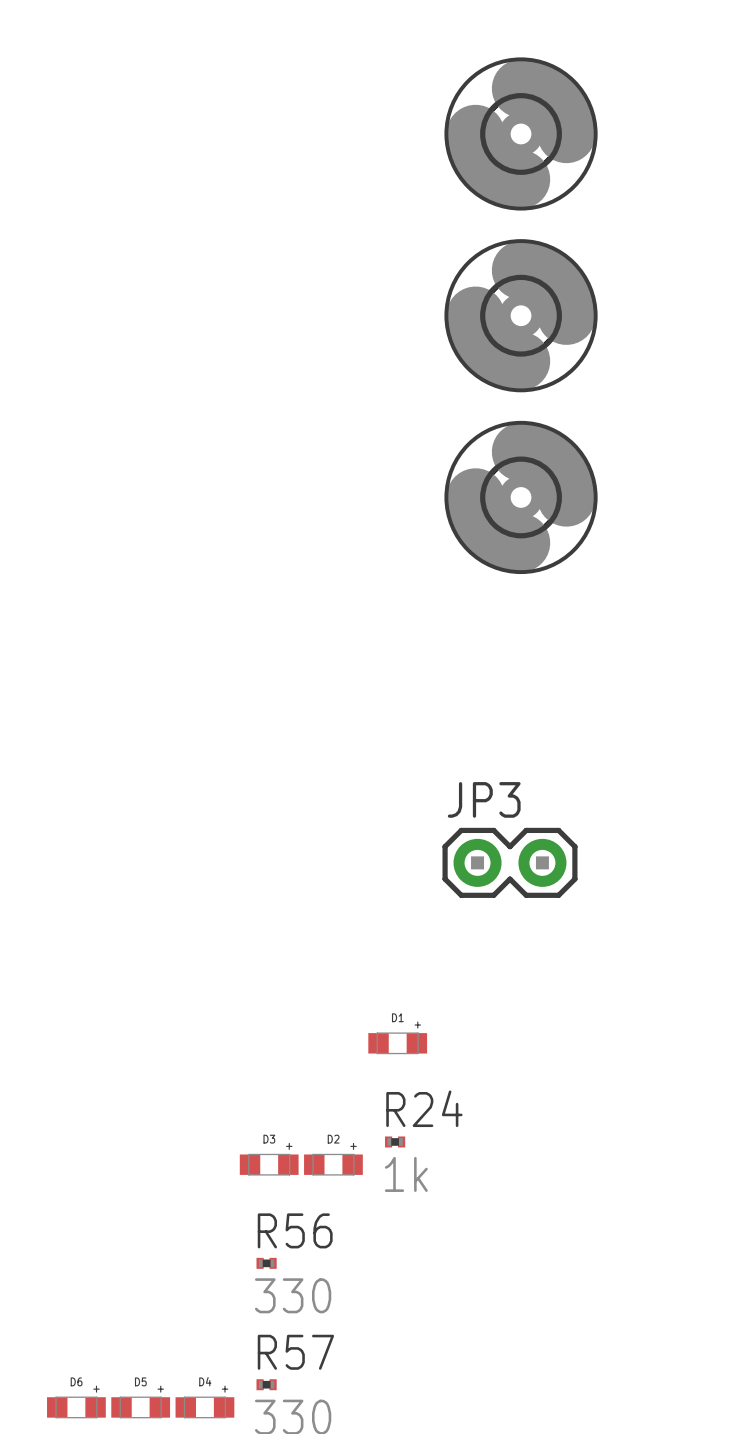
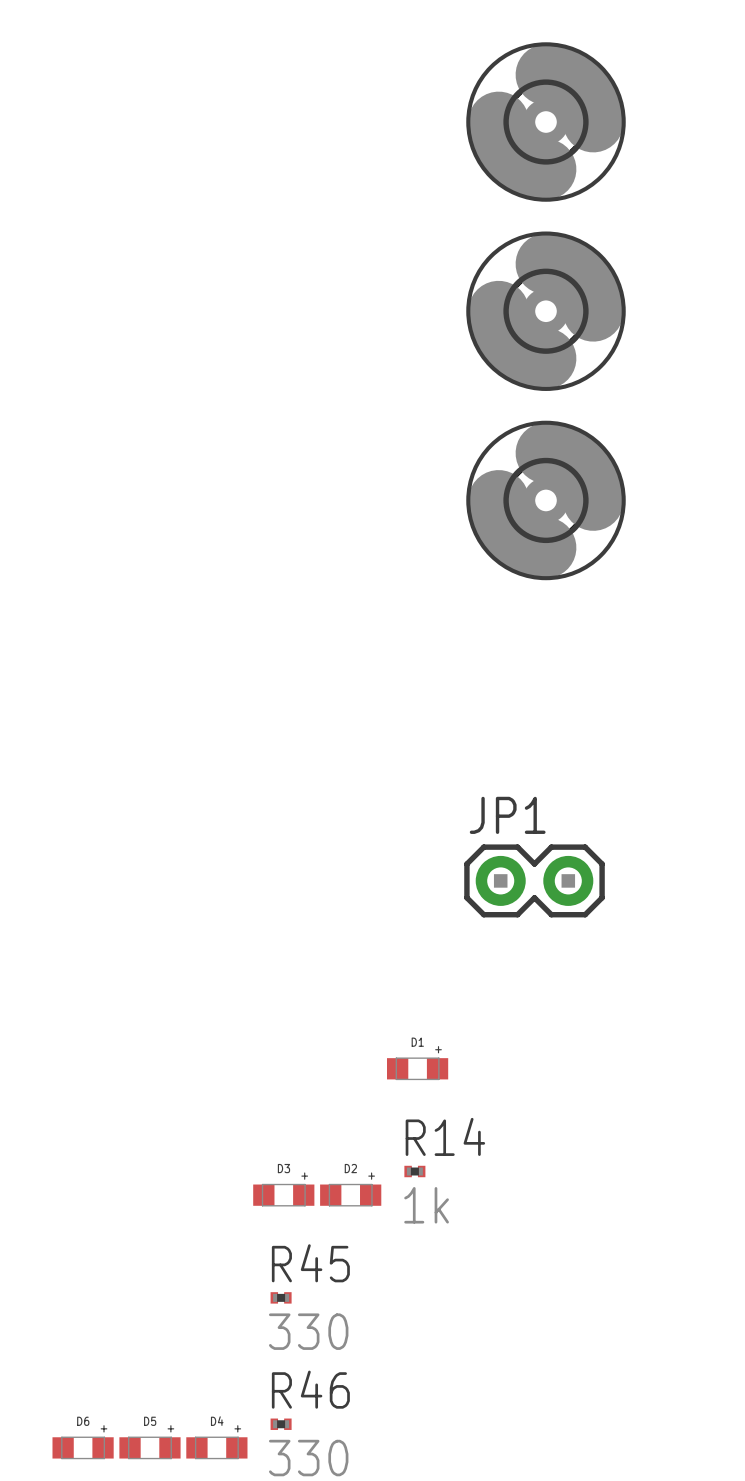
JP3 name: JP3 (484, 799) -> JP1 (507, 815)
R24 name: R24 (424, 1108) -> R14 (445, 1136)
R56 name: R56 (295, 1230) -> R45 (310, 1263)
R57 name: R57 (295, 1352) -> R46 (310, 1389)

